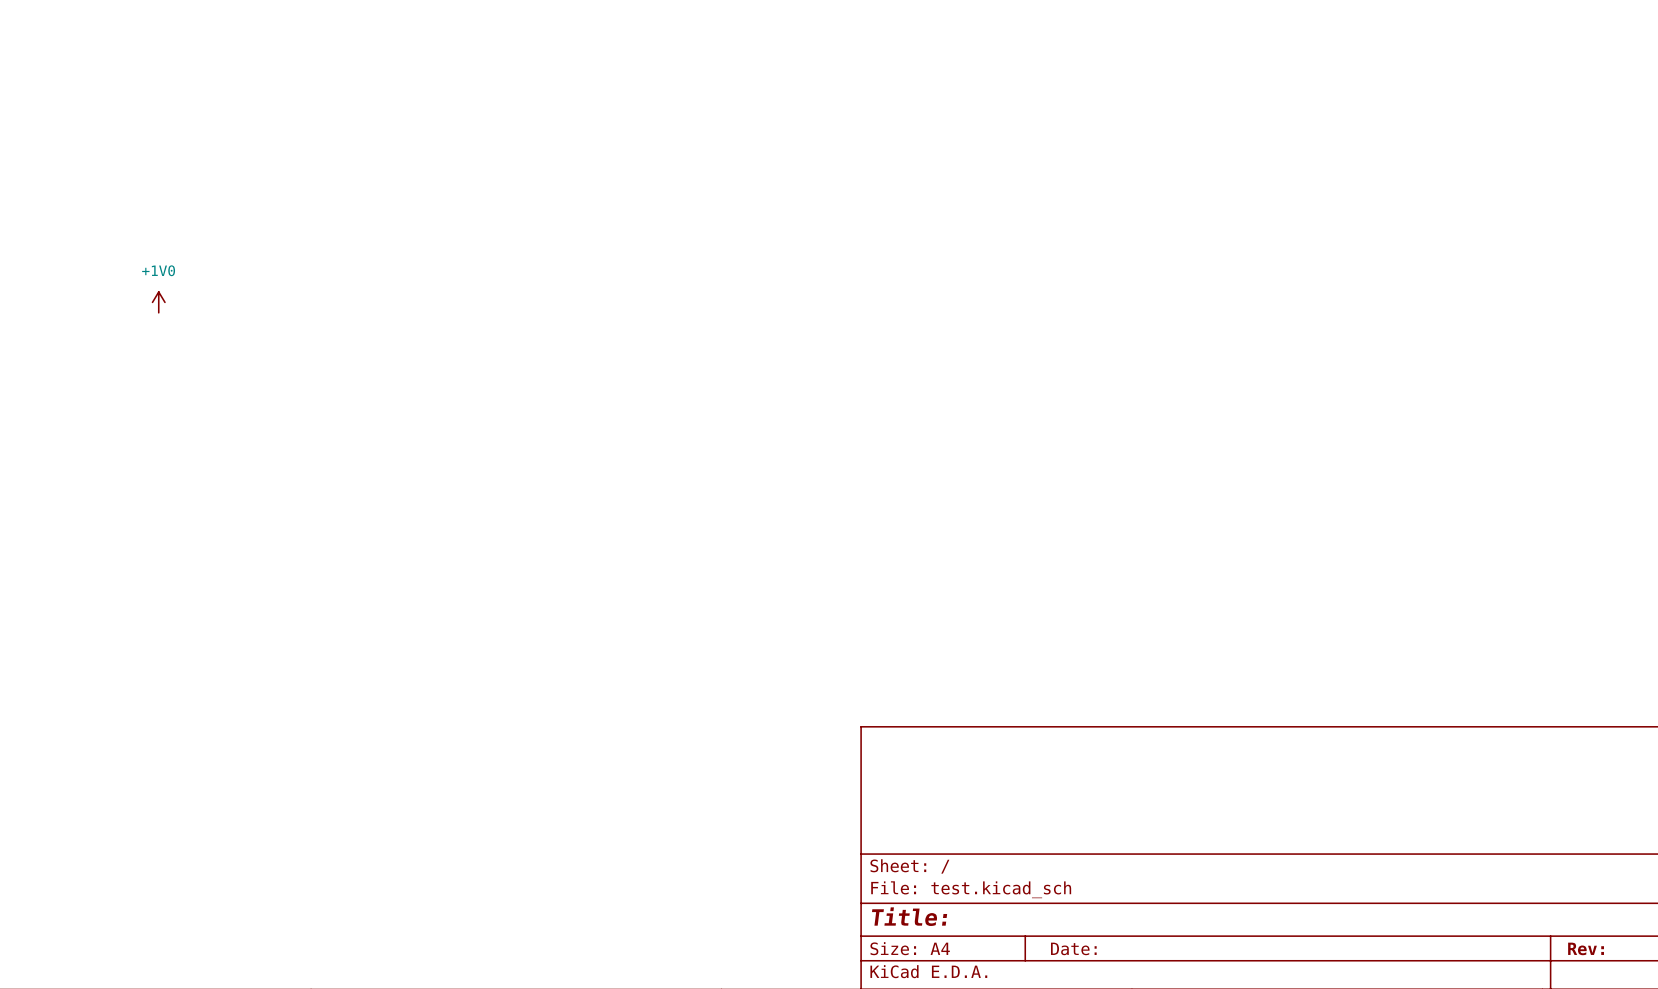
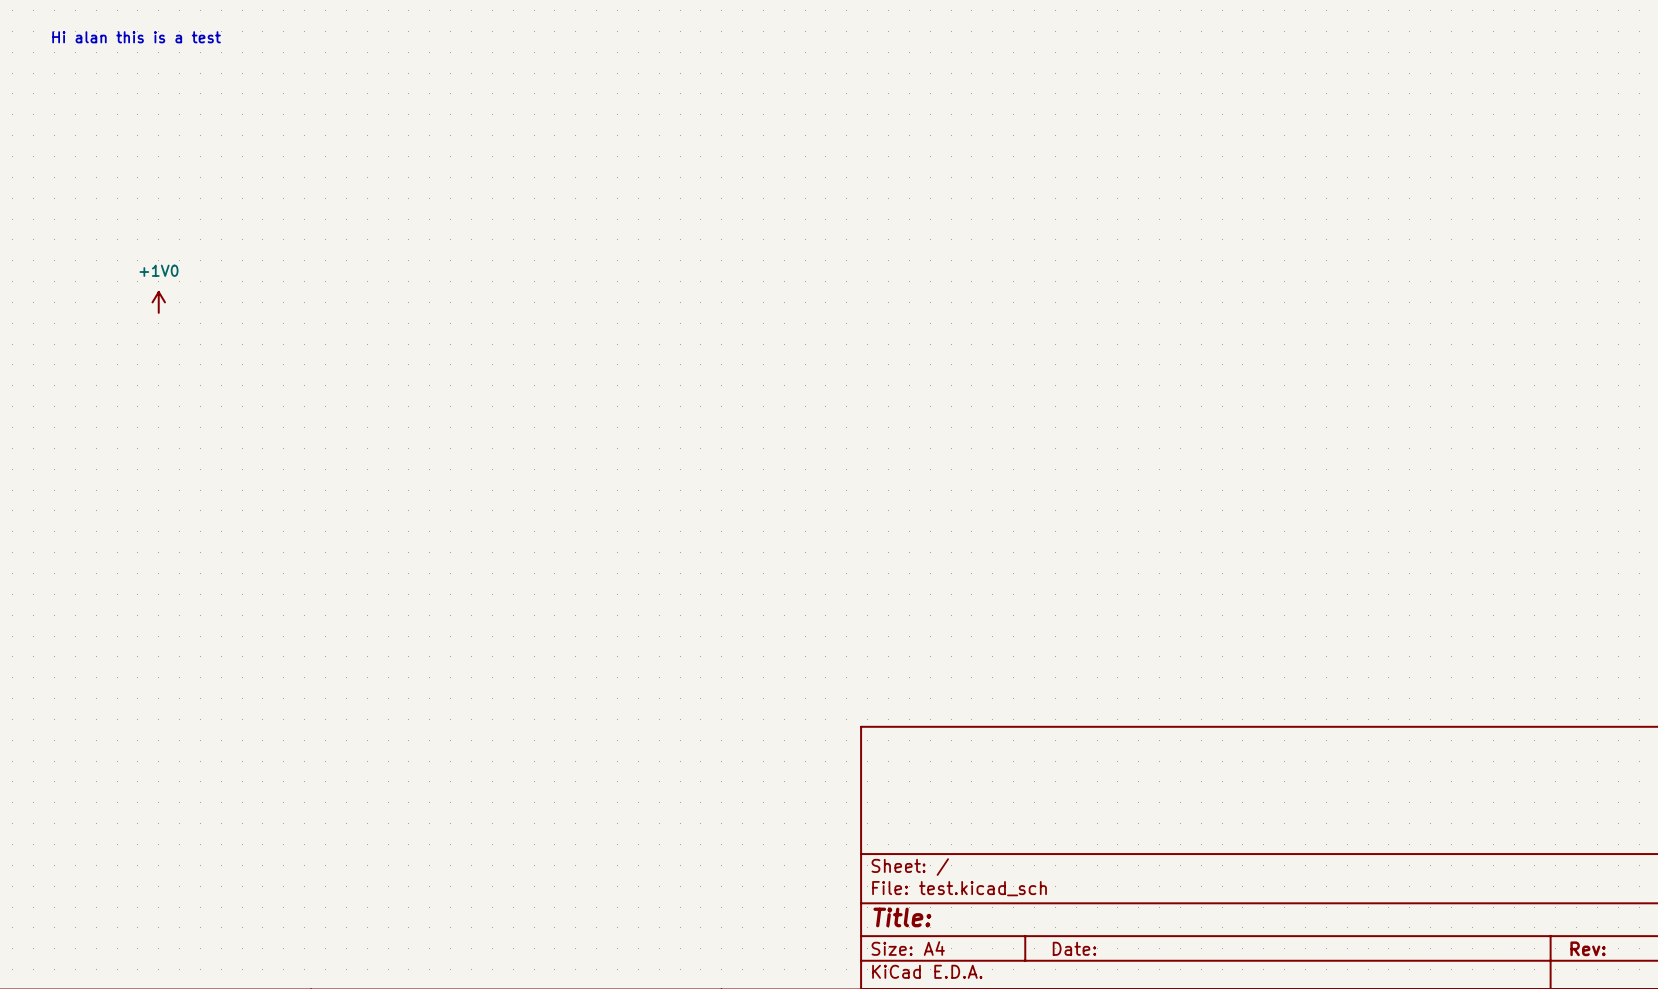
text: none -> Hi alan this is a test (136, 37)

